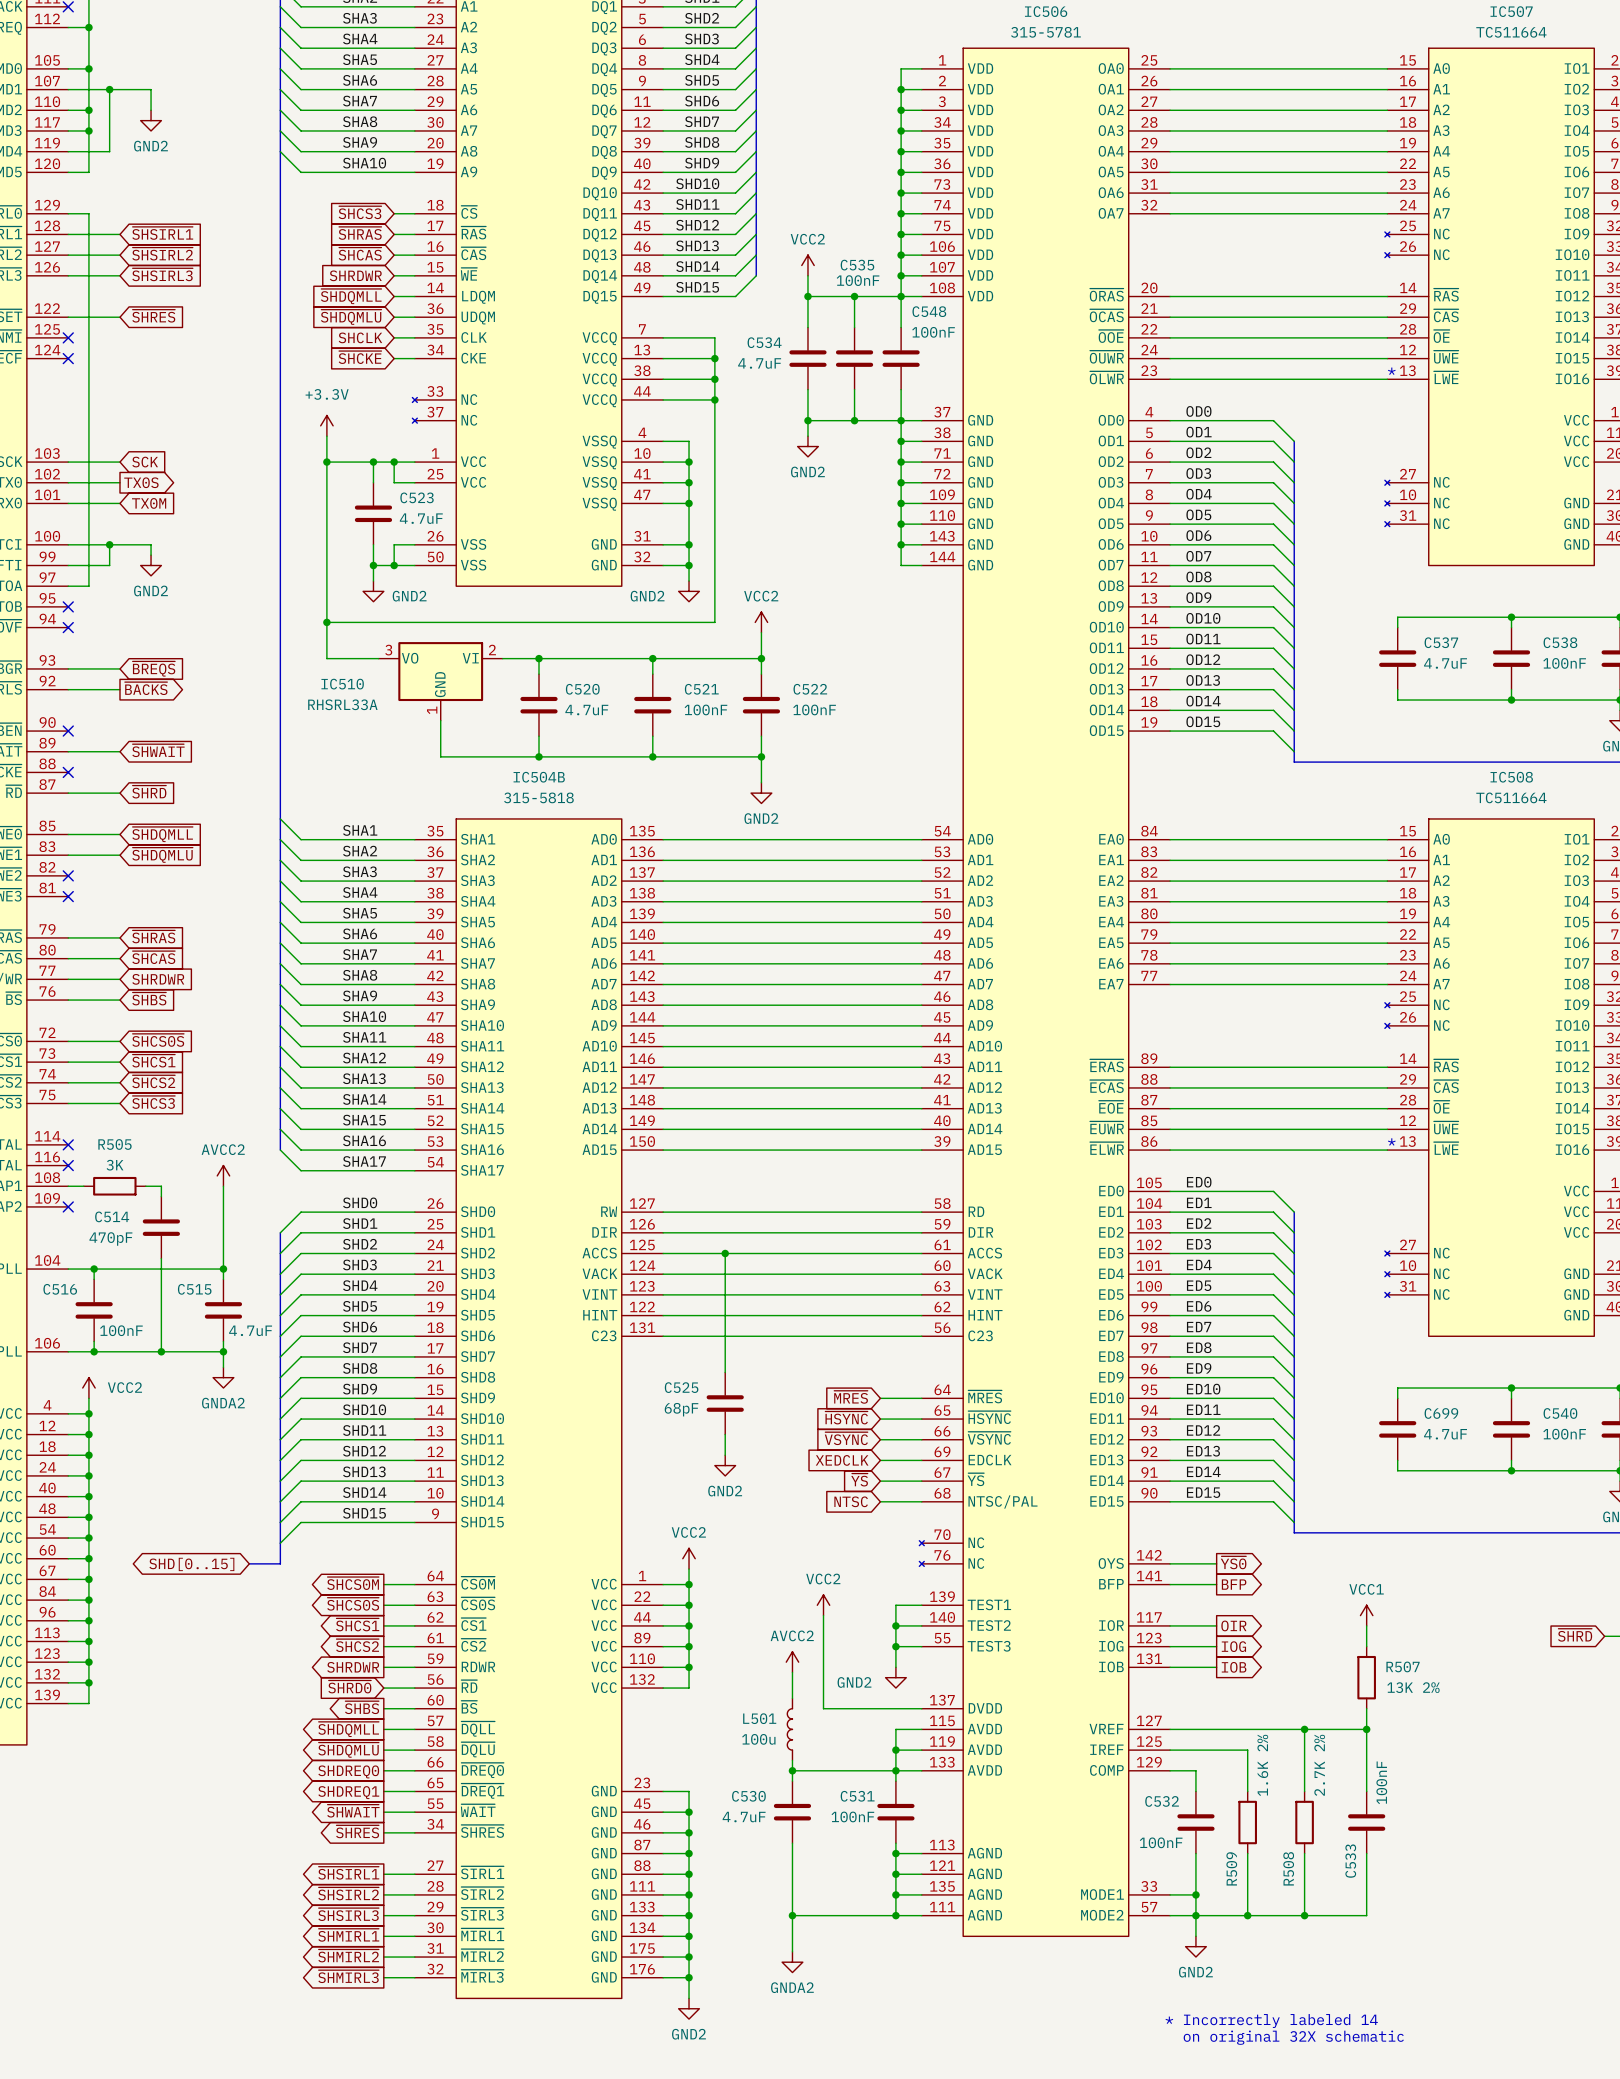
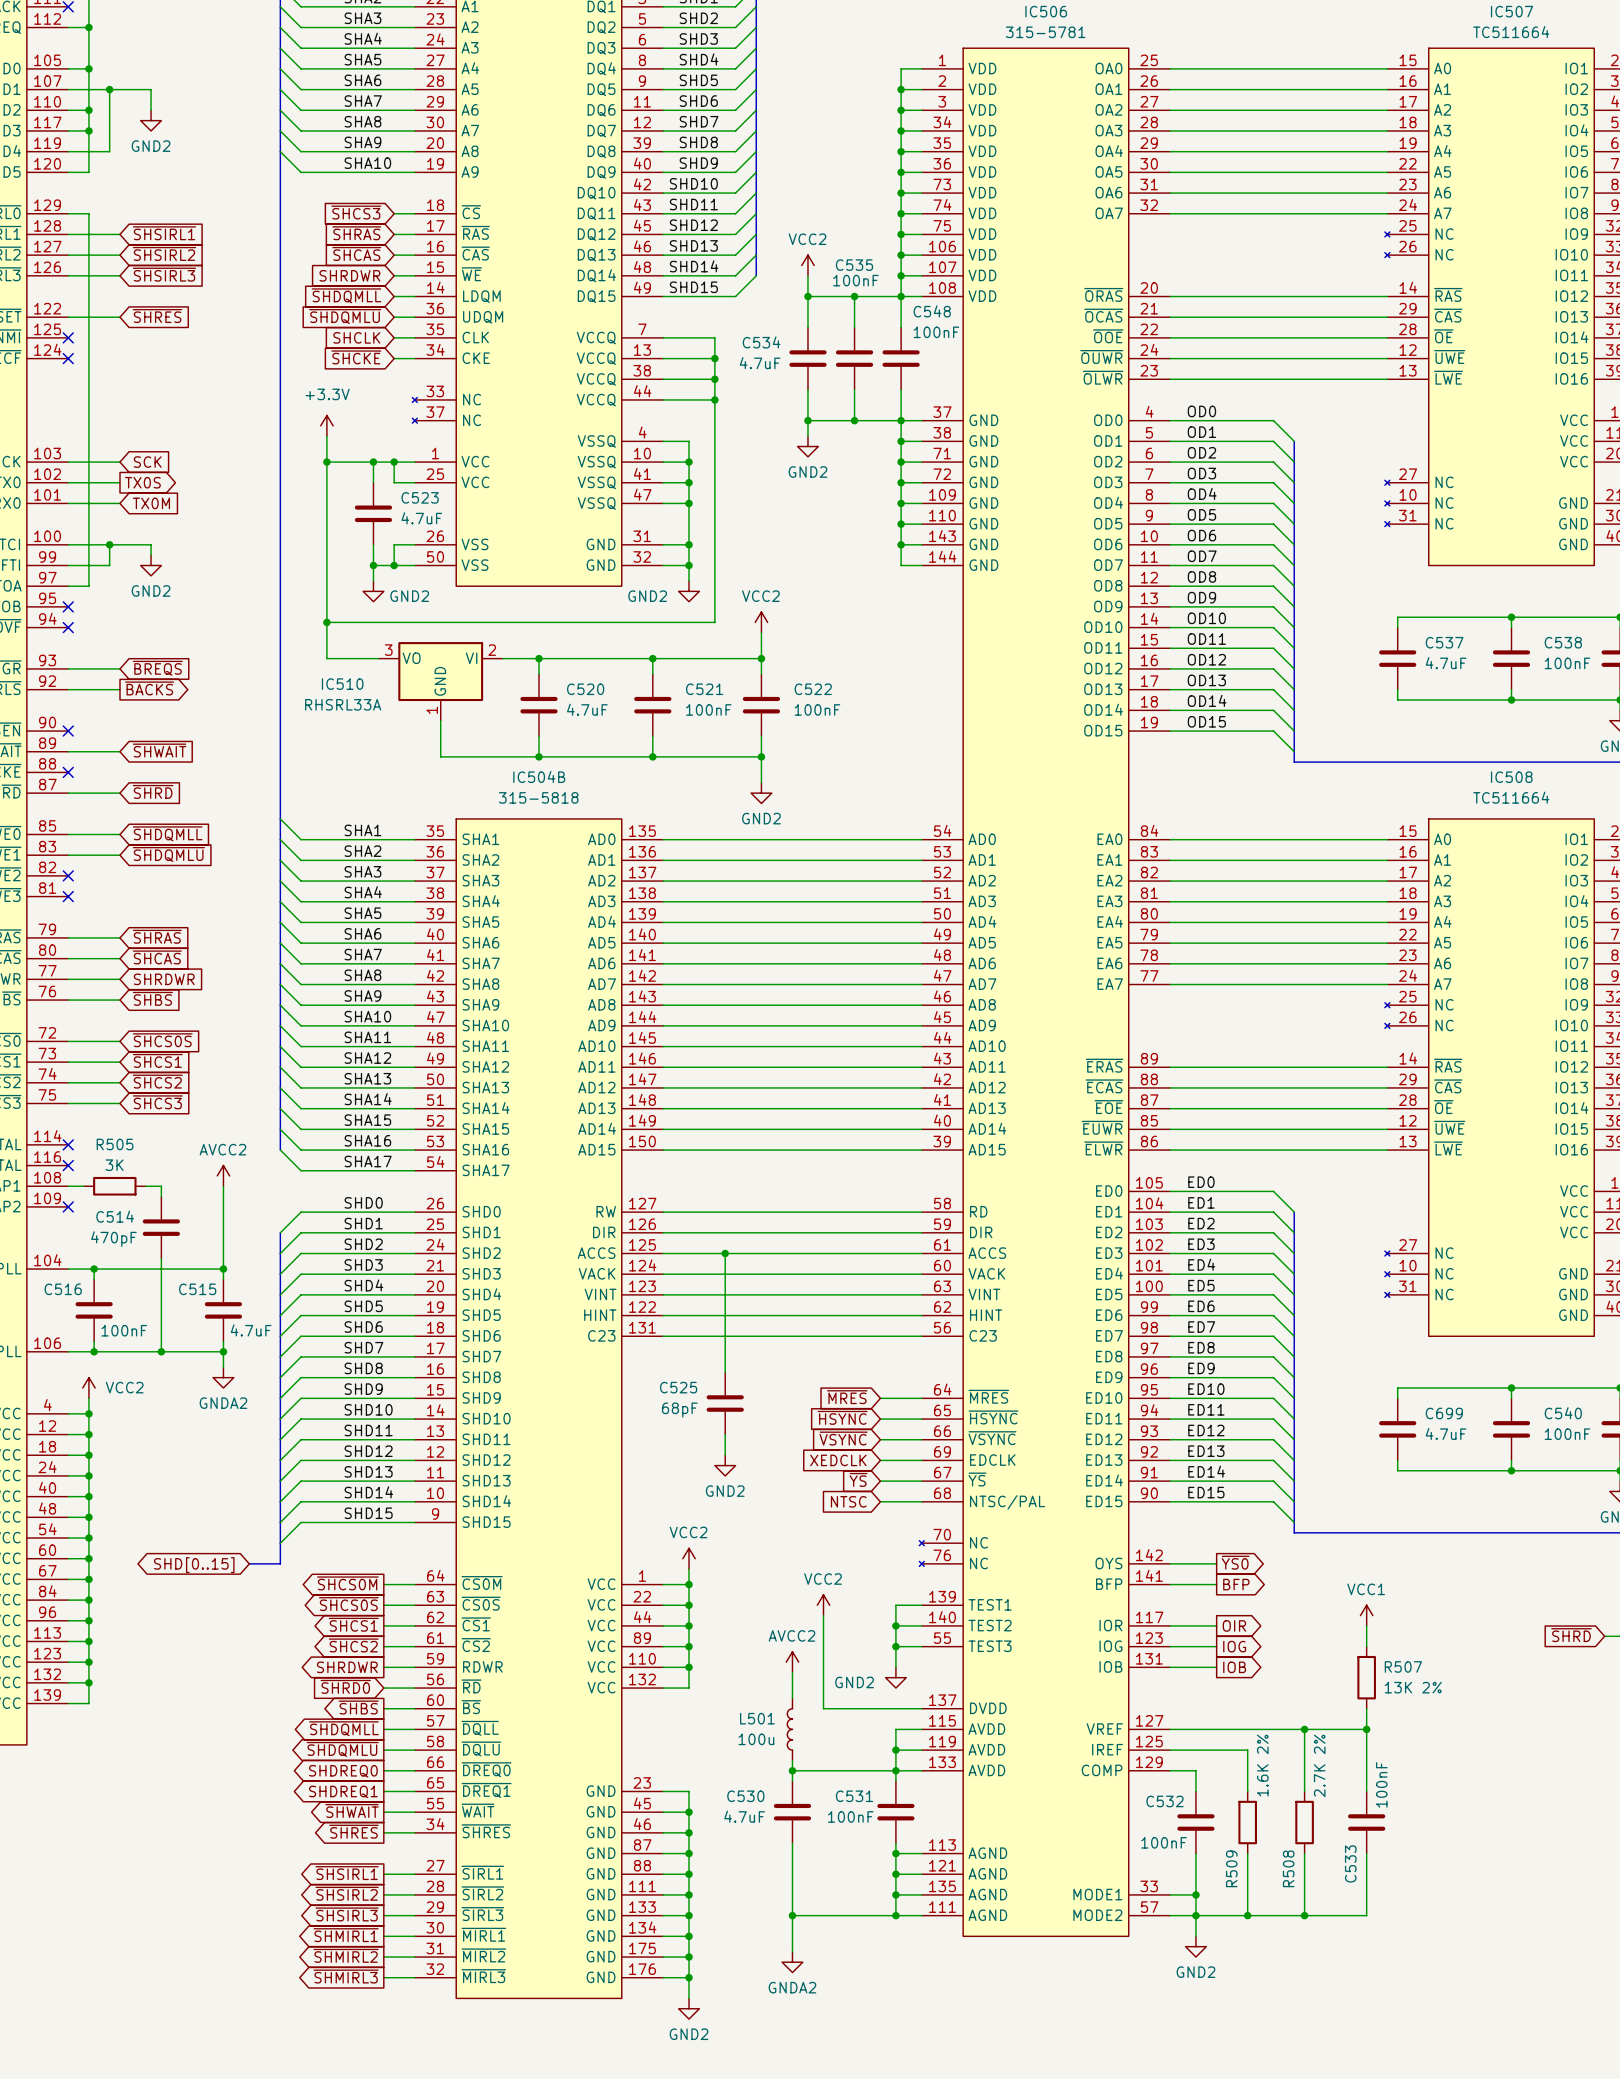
text: * (1391, 371) -> none
text: * (1391, 1142) -> none
text: * Incorrectly labeled 14 (1271, 2021) -> none
text: on original 32X schematic (1293, 2037) -> none

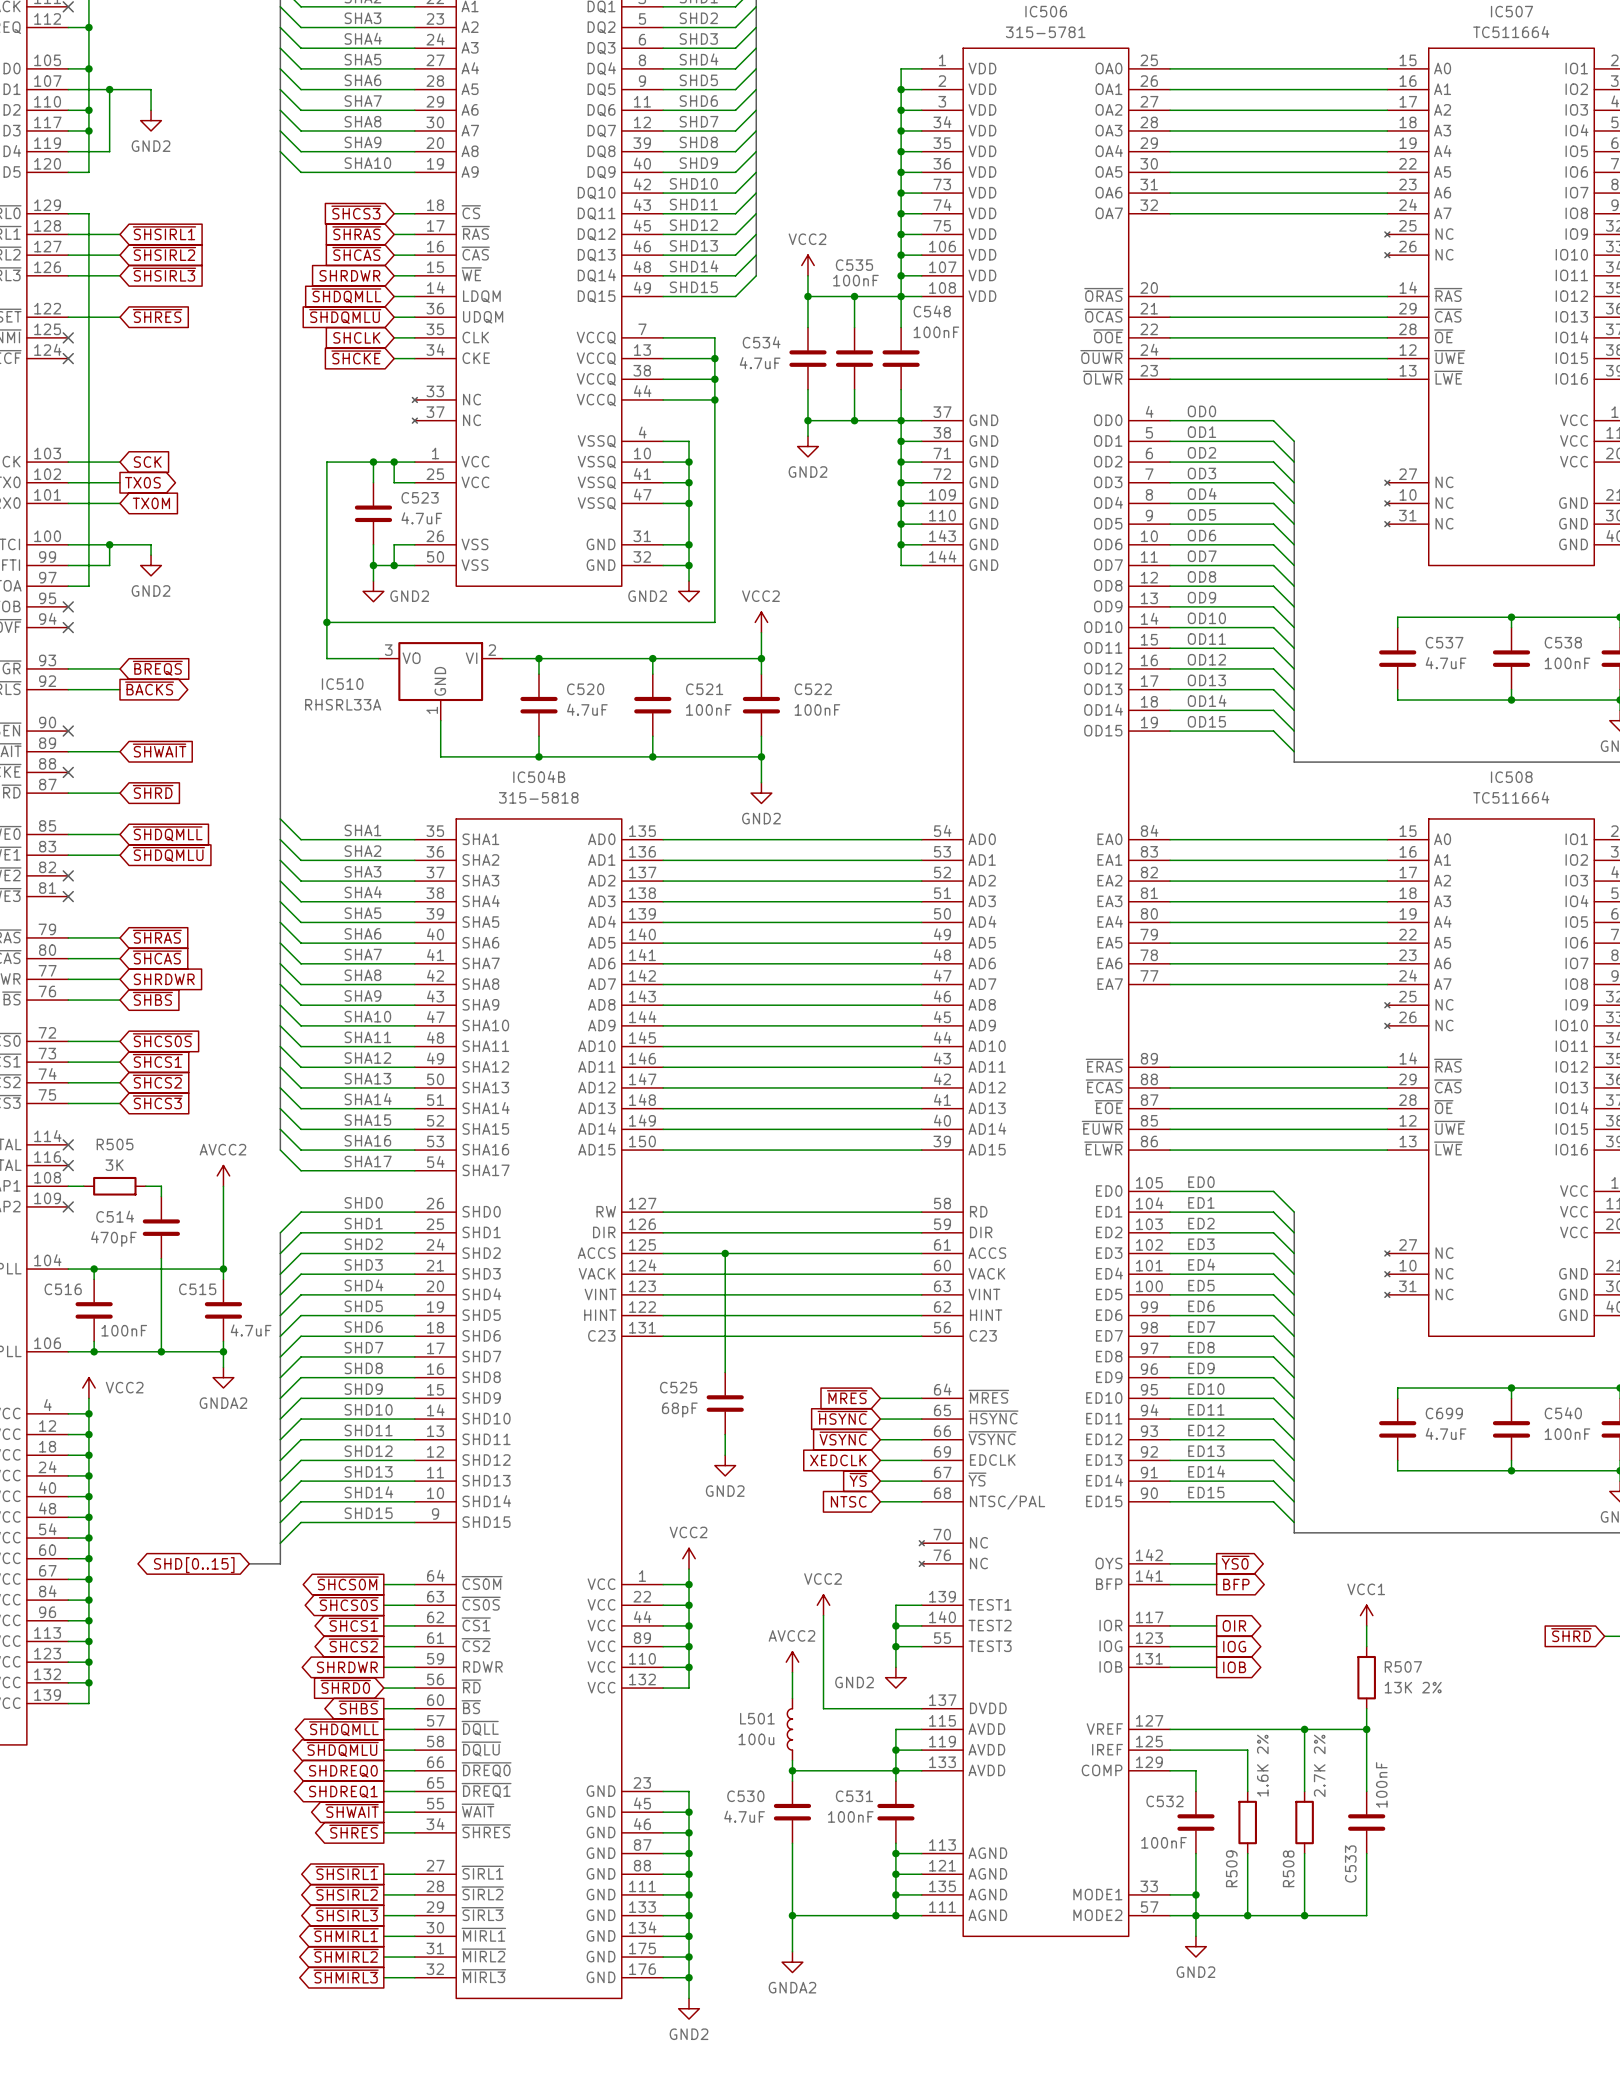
power symbol: +3.3V (326, 425) -> none
wire: (326, 436) (326, 462) -> none
junction: (326, 462) -> none

